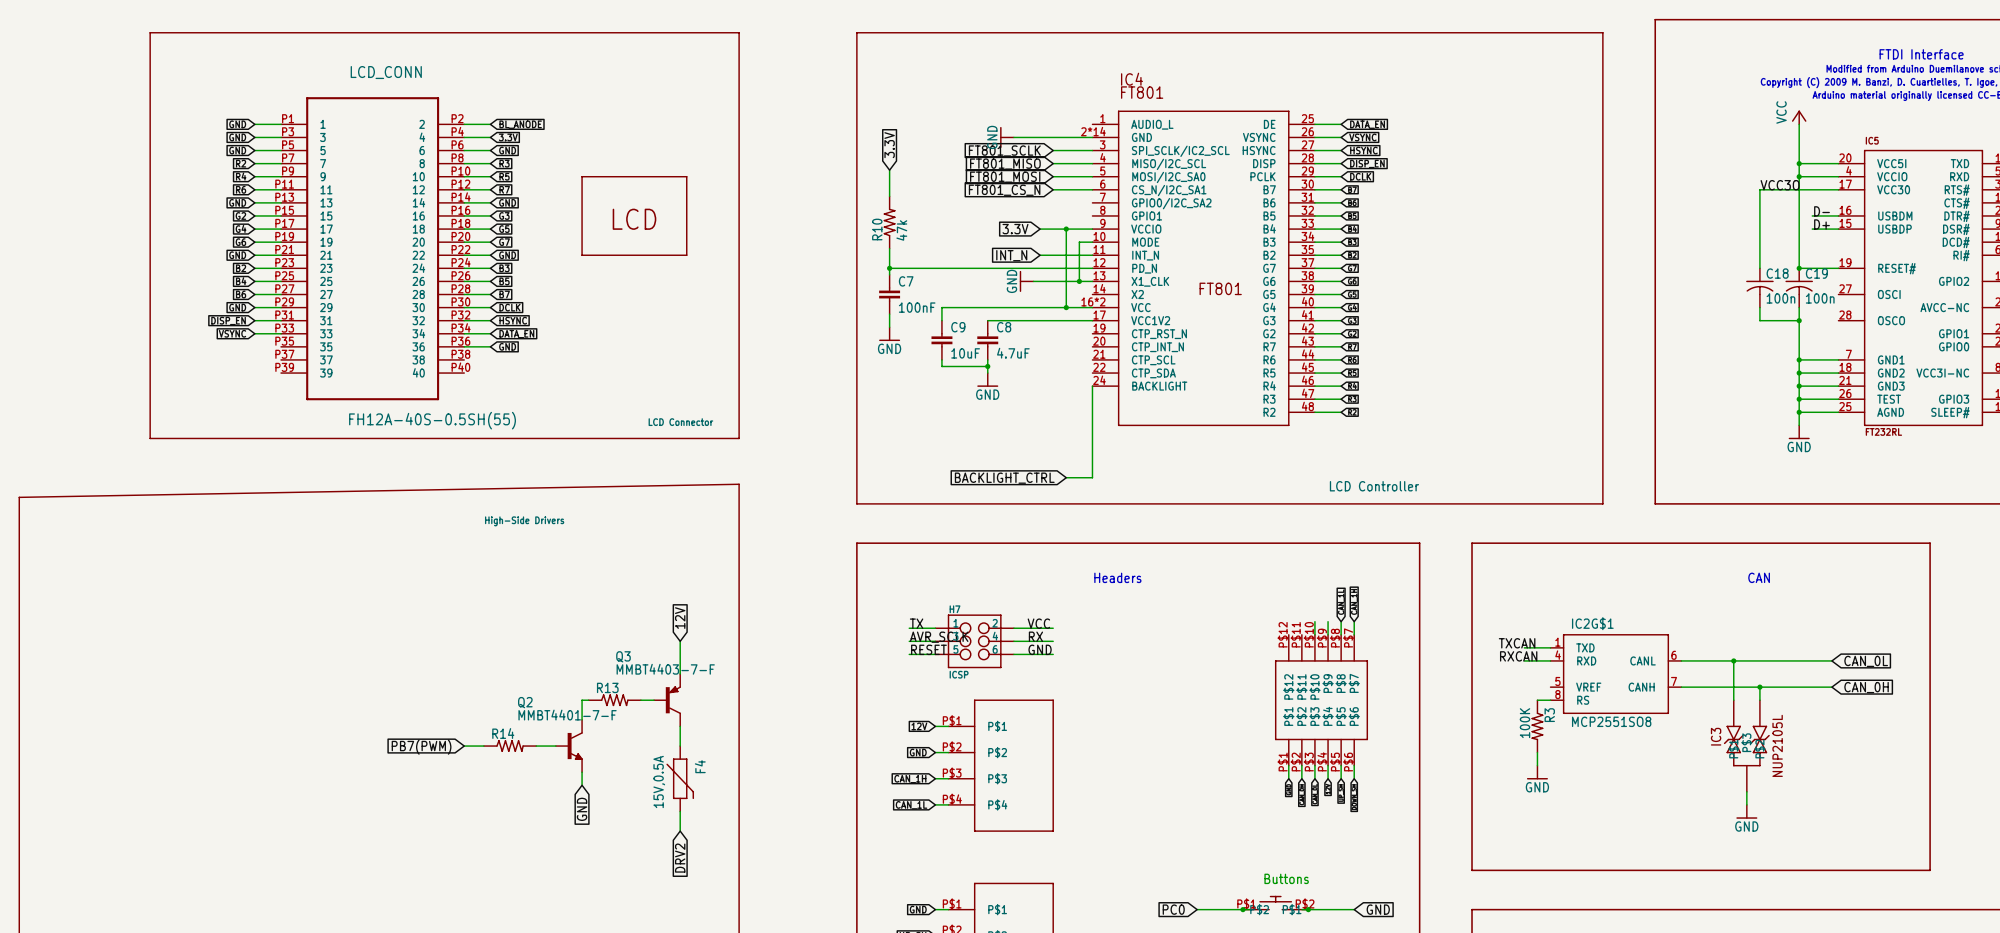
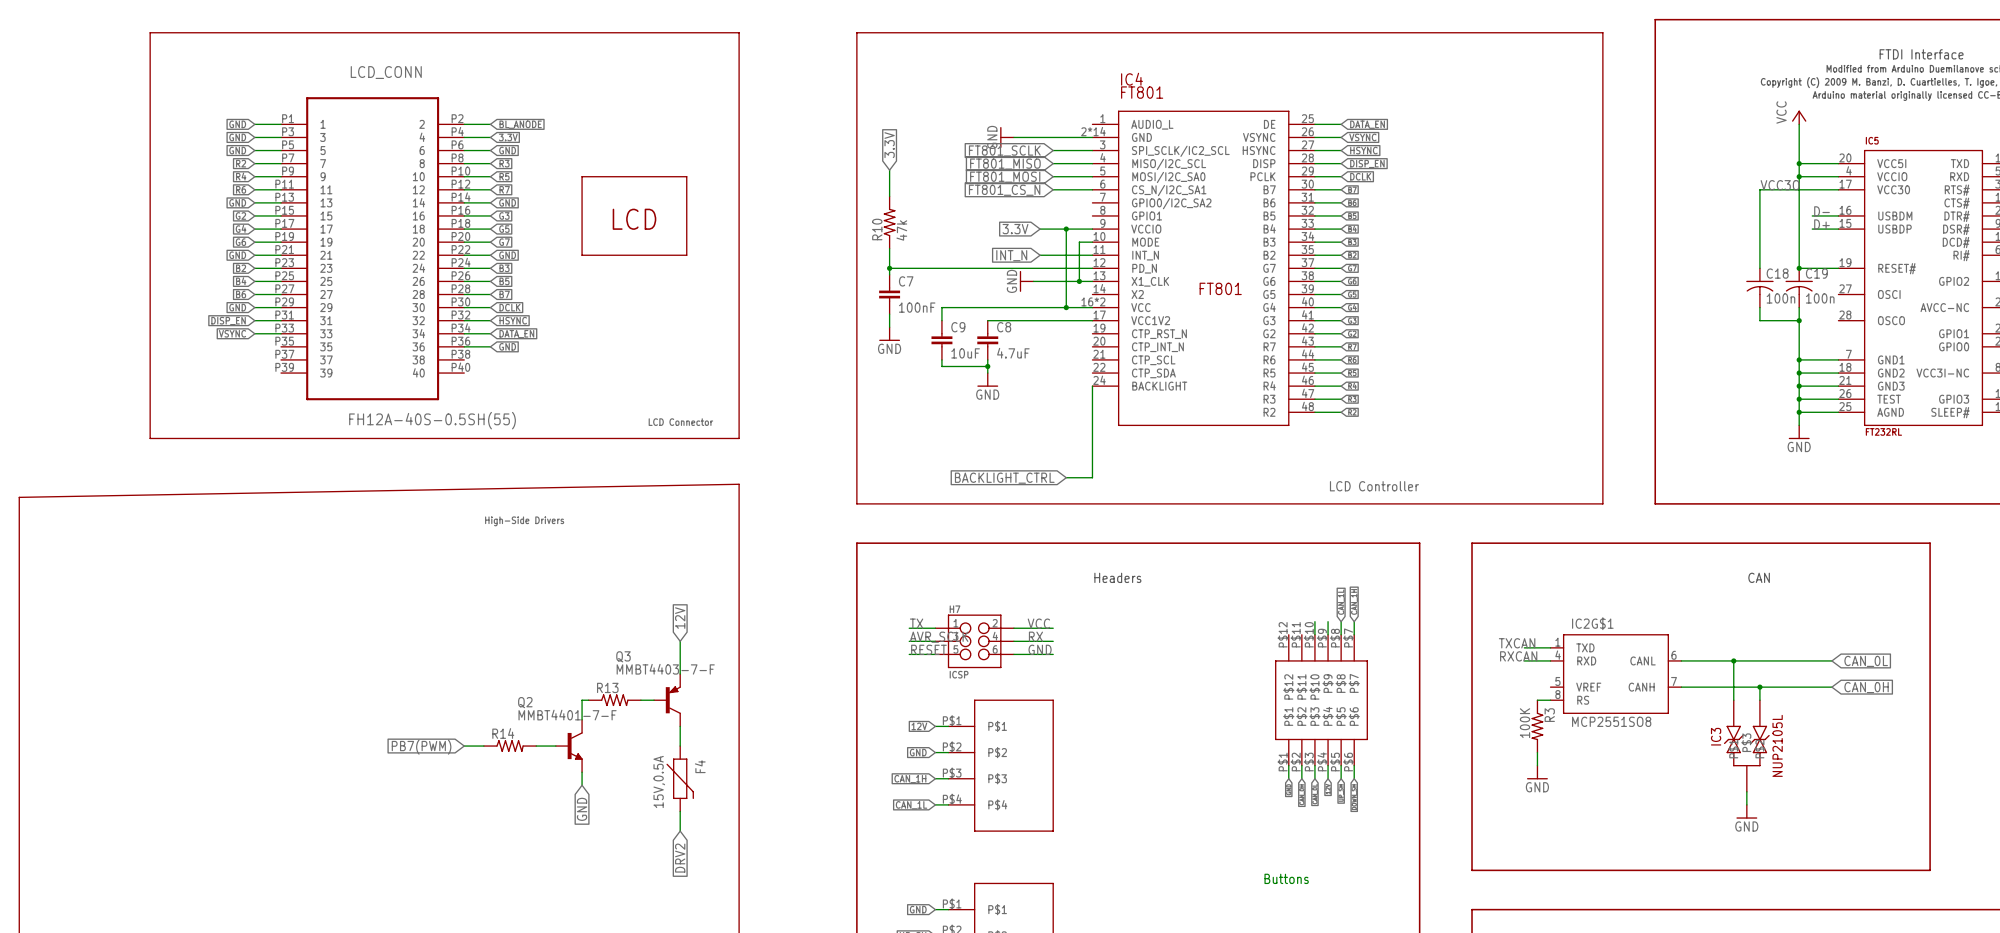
part: (1275, 902) -> none
global label: PC0 (1173, 909) -> none
wire: (1197, 909) (1249, 909) -> none
junction: (1242, 909) -> none
wire: (1301, 909) (1354, 909) -> none
junction: (1308, 909) -> none
global label: GND (1378, 909) -> none

